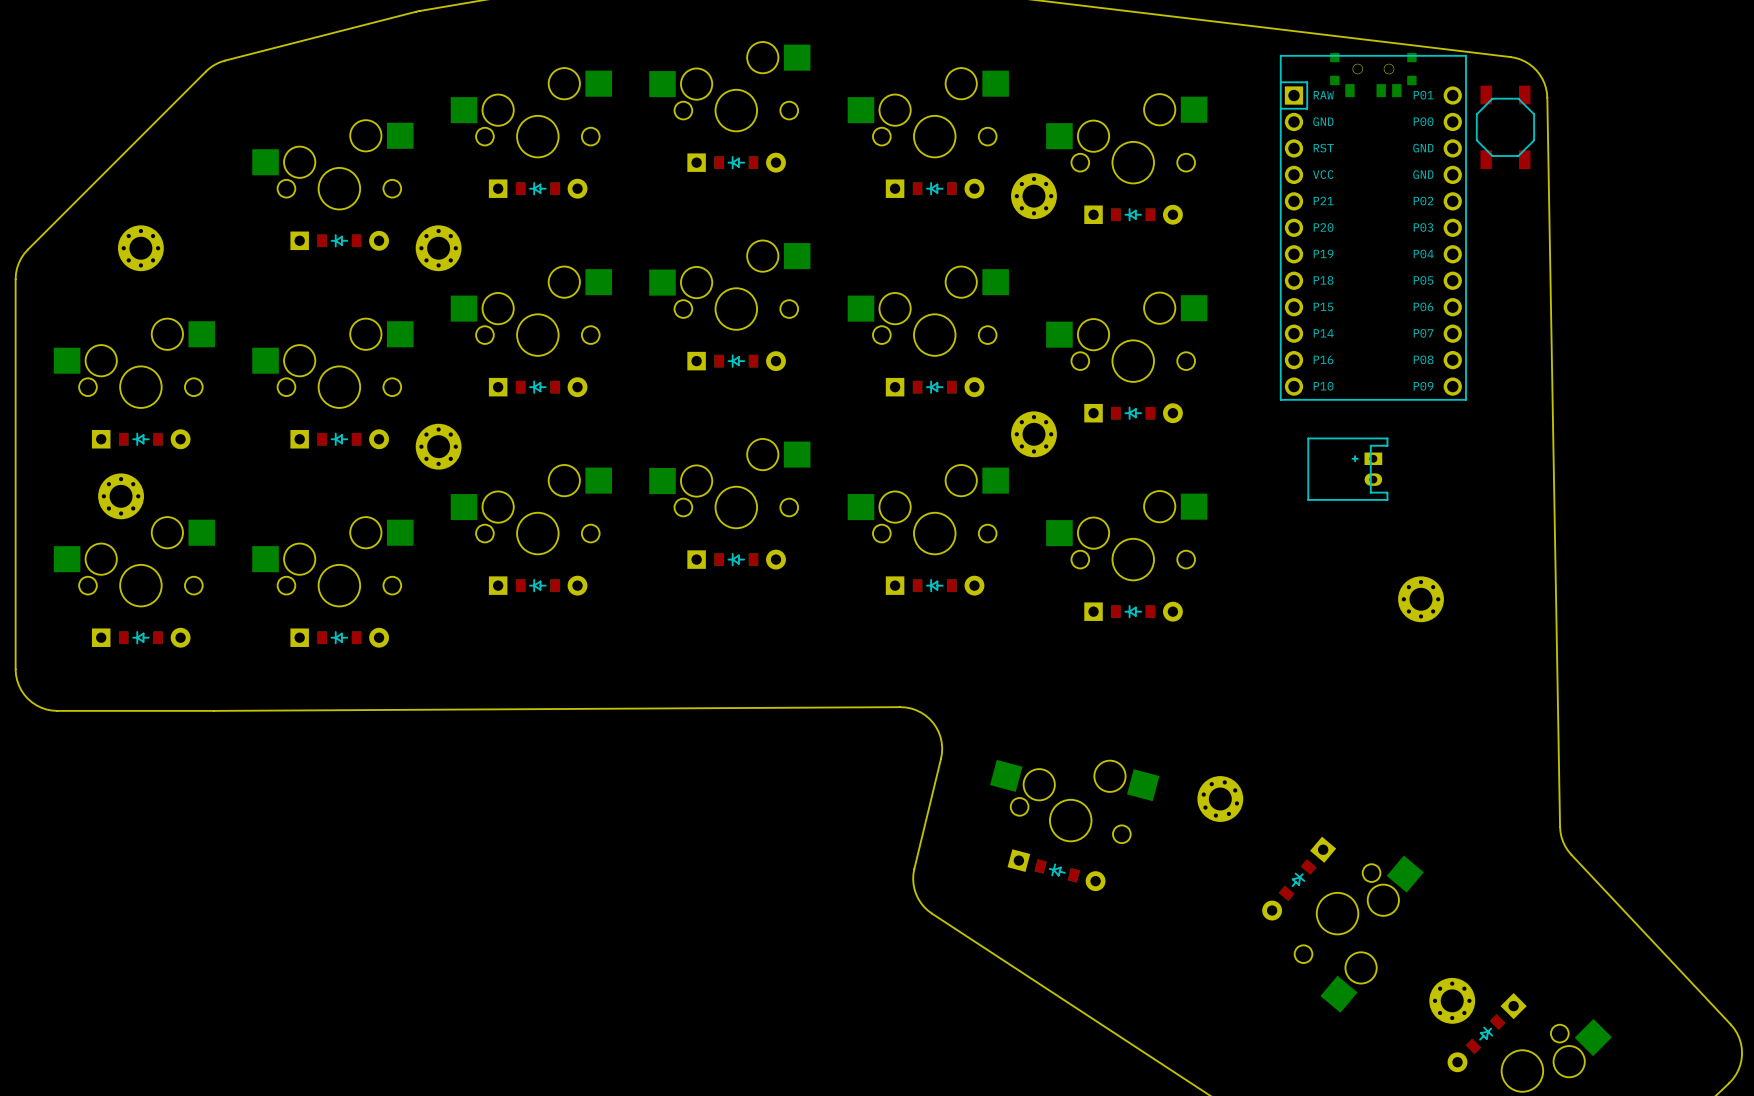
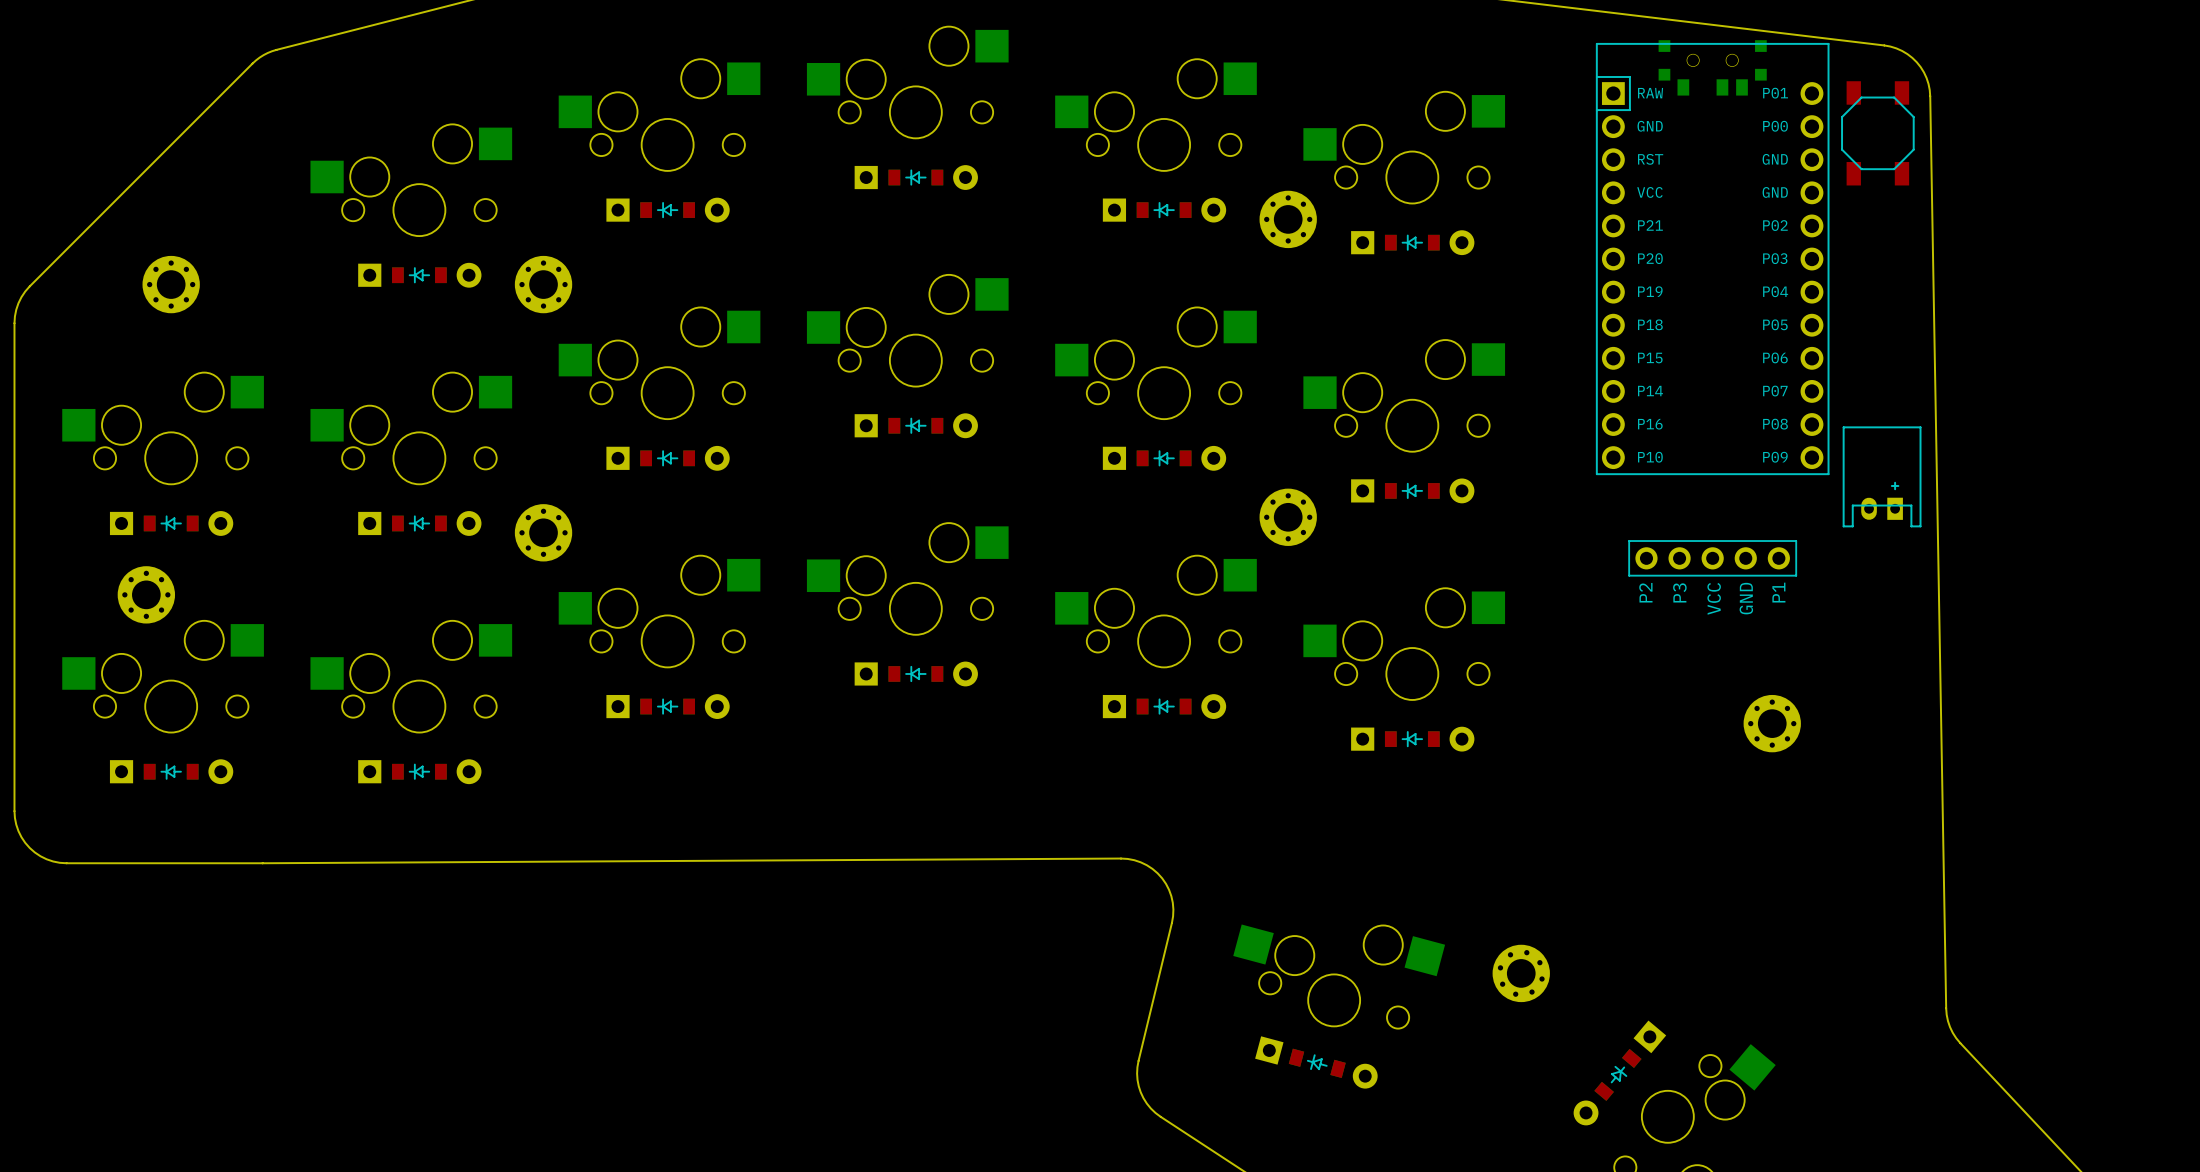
part: none -> (1712, 558)
part rotation: 0° (1347, 469) -> 90° clockwise (1882, 476)
part position: (1347, 469) -> (1882, 476)

